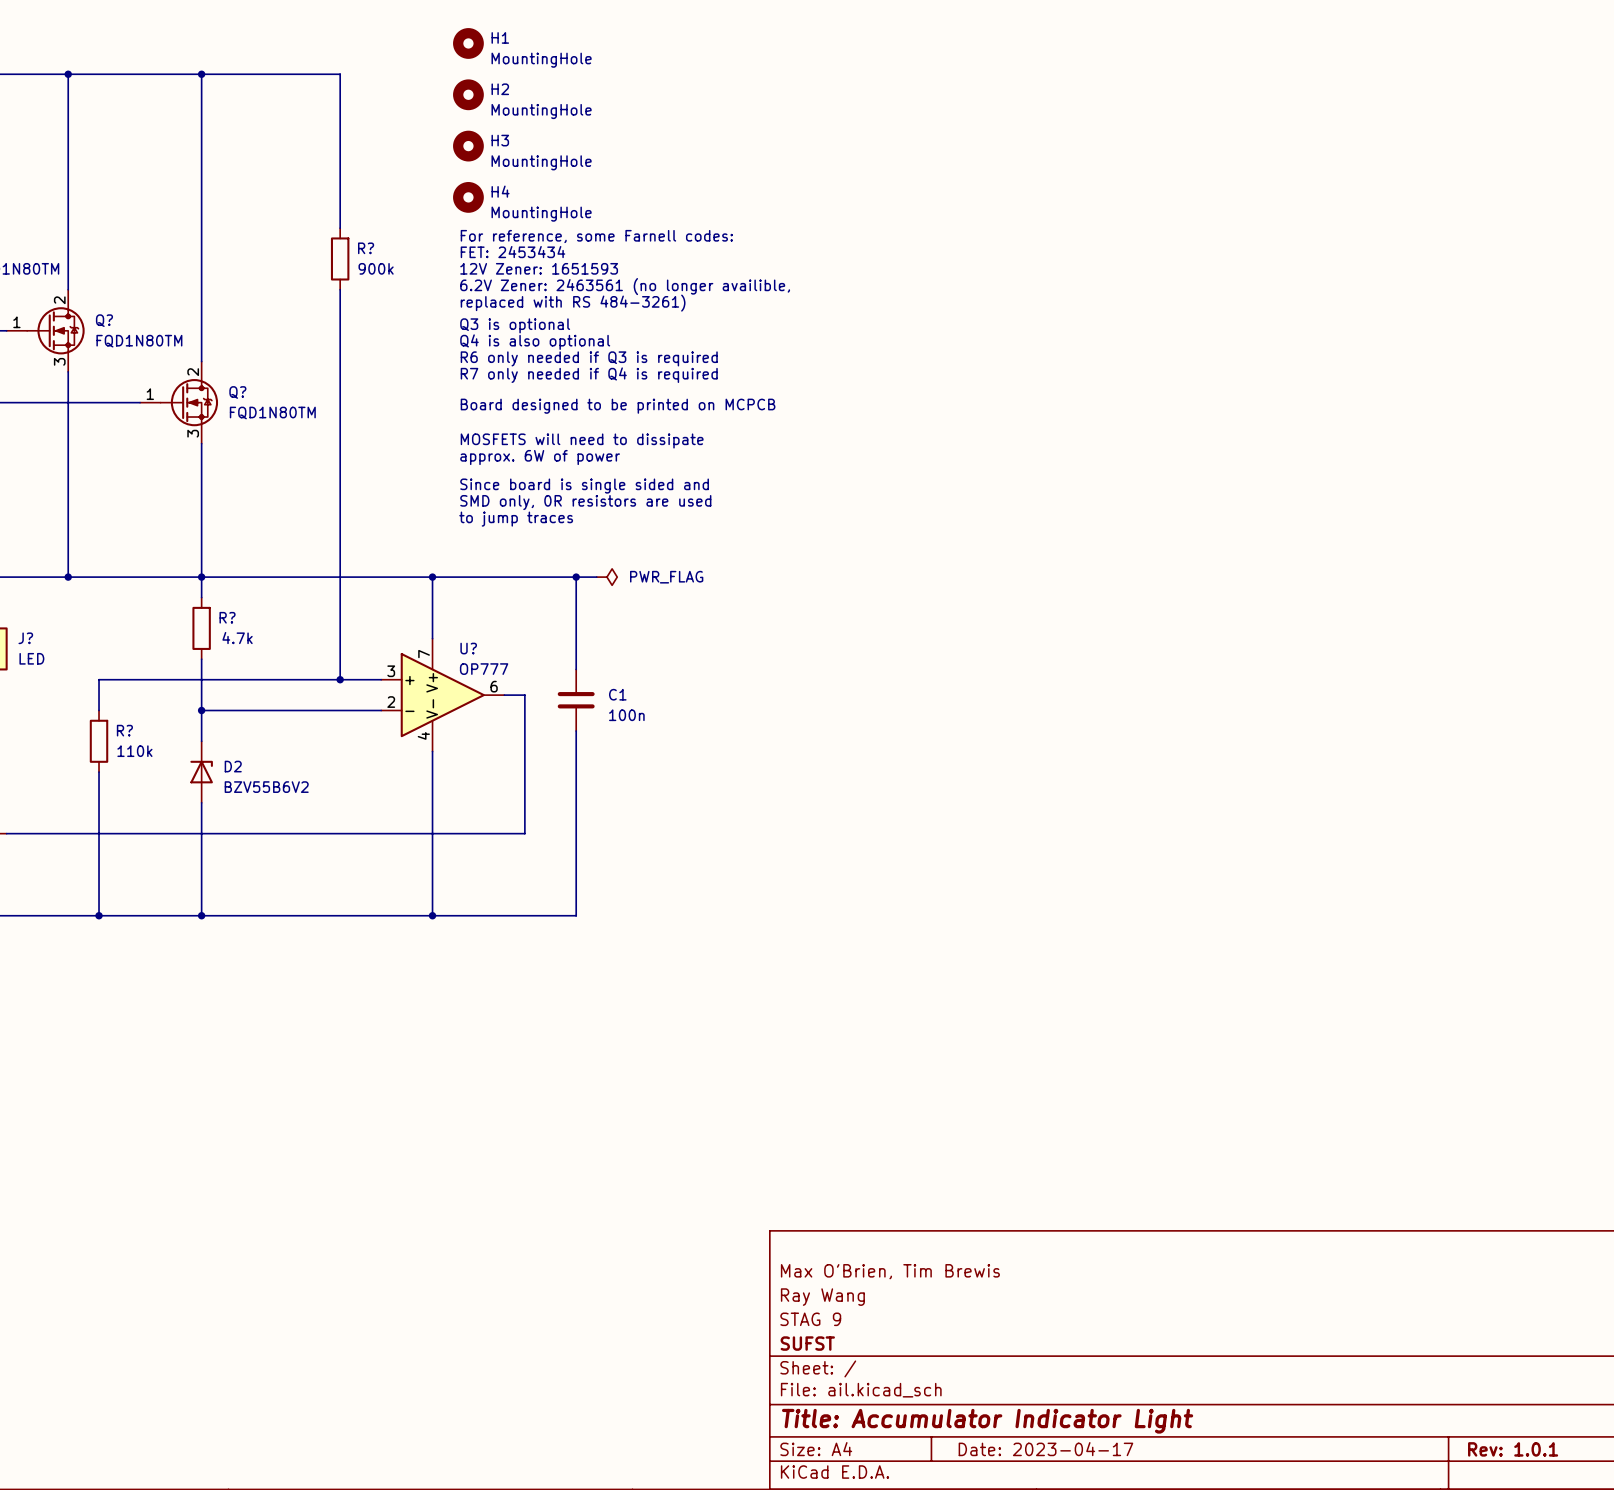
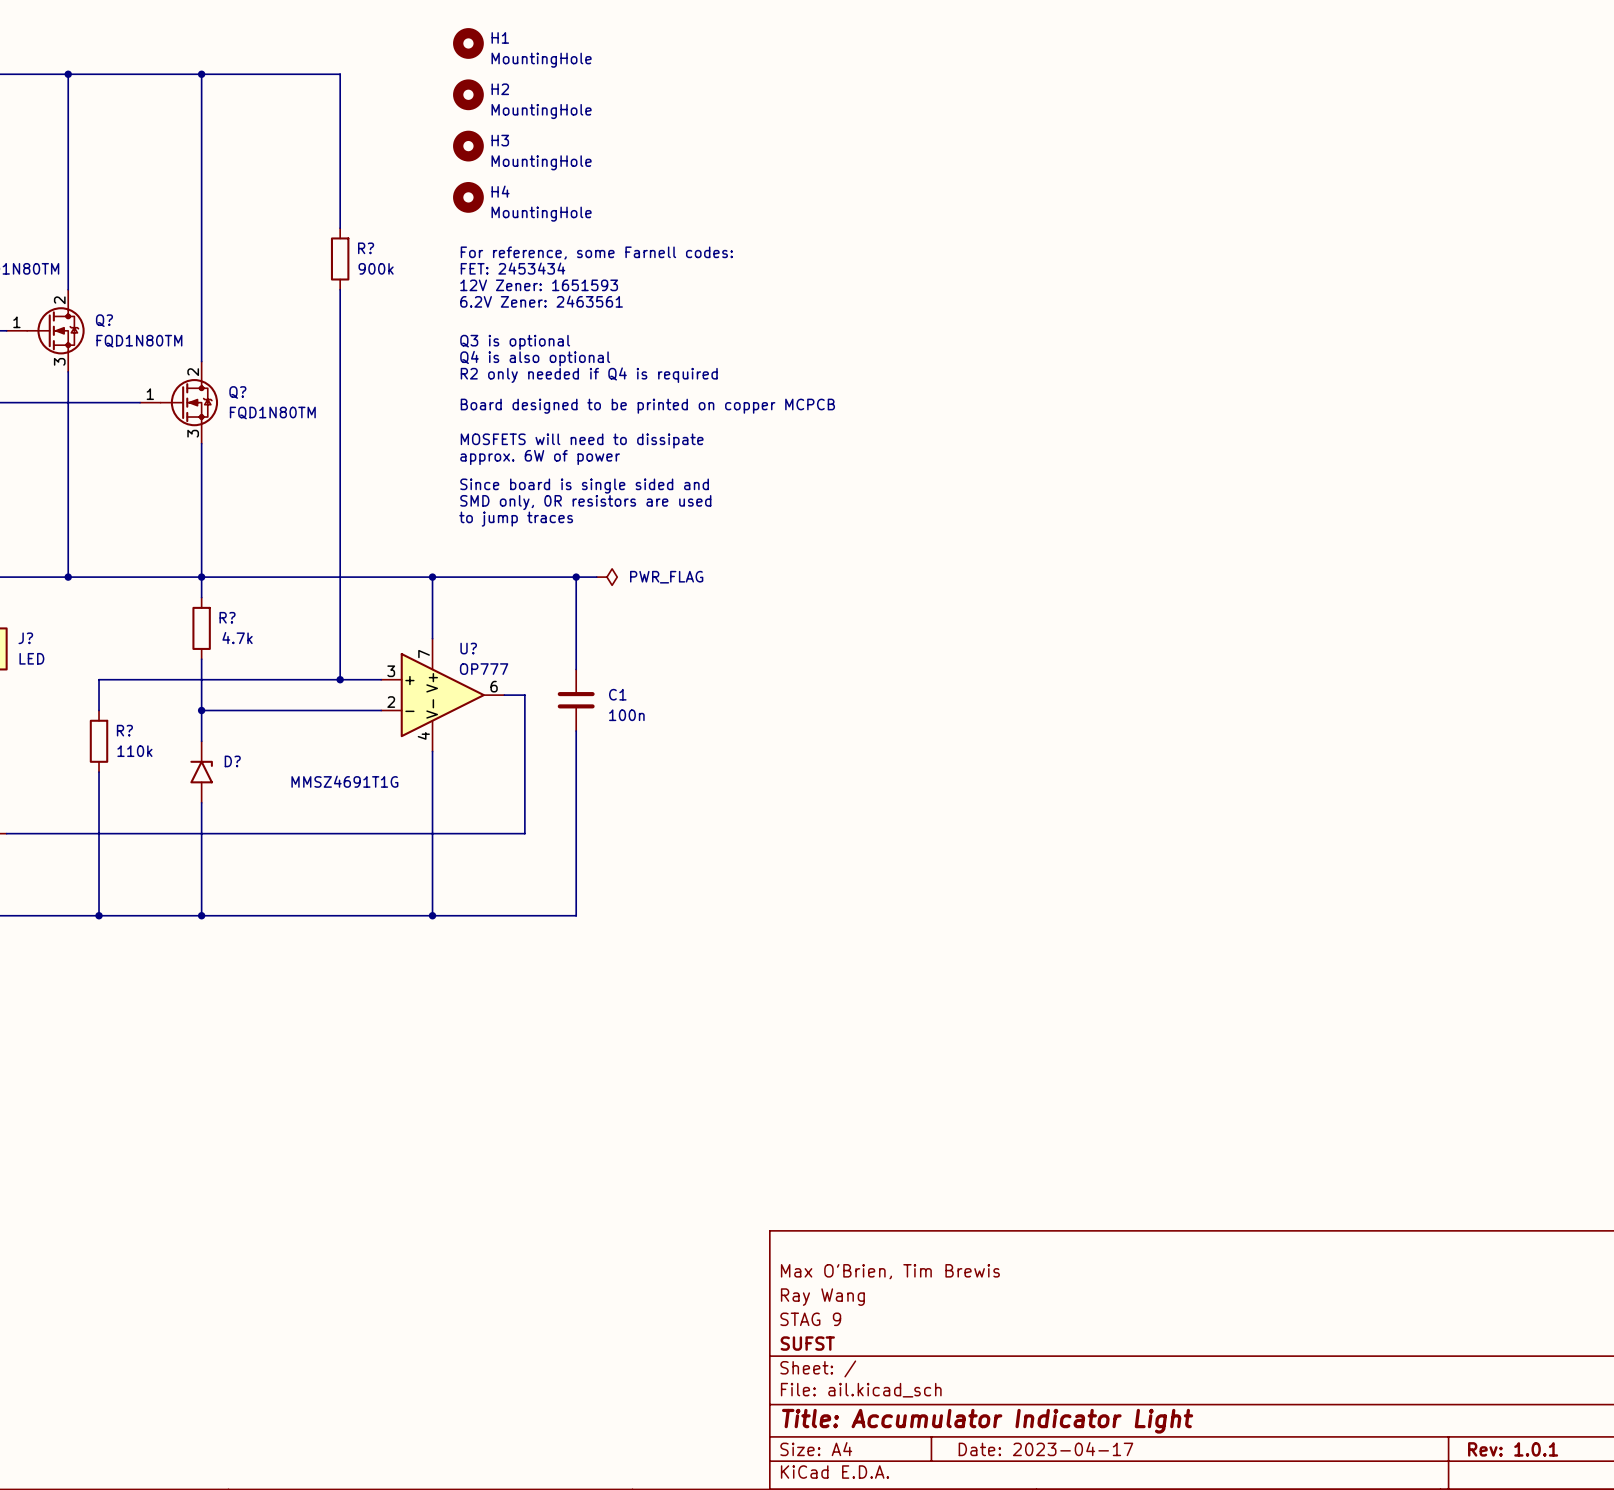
text: For reference, some Farnell codes: (596, 236) -> none
text: FET: 2453434 (512, 252) -> For reference, some Farnell codes: (596, 253)
text: 12V Zener: 1651593 (539, 268) -> FET: 2453434 (512, 268)
text: 6.2V Zener: 2463561 (no longer availible, (625, 286) -> 12V Zener: 1651593 (539, 285)
text: replaced with RS 484-3261) (573, 303) -> 6.2V Zener: 2463561 (541, 301)
text: Q3 is optional (515, 325) -> none
text: Q4 is also optional (535, 342) -> Q3 is optional (515, 342)
text: R6 only needed if Q3 is required (589, 358) -> Q4 is also optional (535, 358)
text: R7 only needed if Q4 is required (589, 375) -> R2 only needed if Q4 is required (589, 375)
text: Board designed to be printed on MCPCB (618, 406) -> Board designed to be printed on copper MCPCB (647, 406)
D2: BZV55B6V2 (201, 772) -> none
D?: none -> MMSZ4691T1G (201, 772)

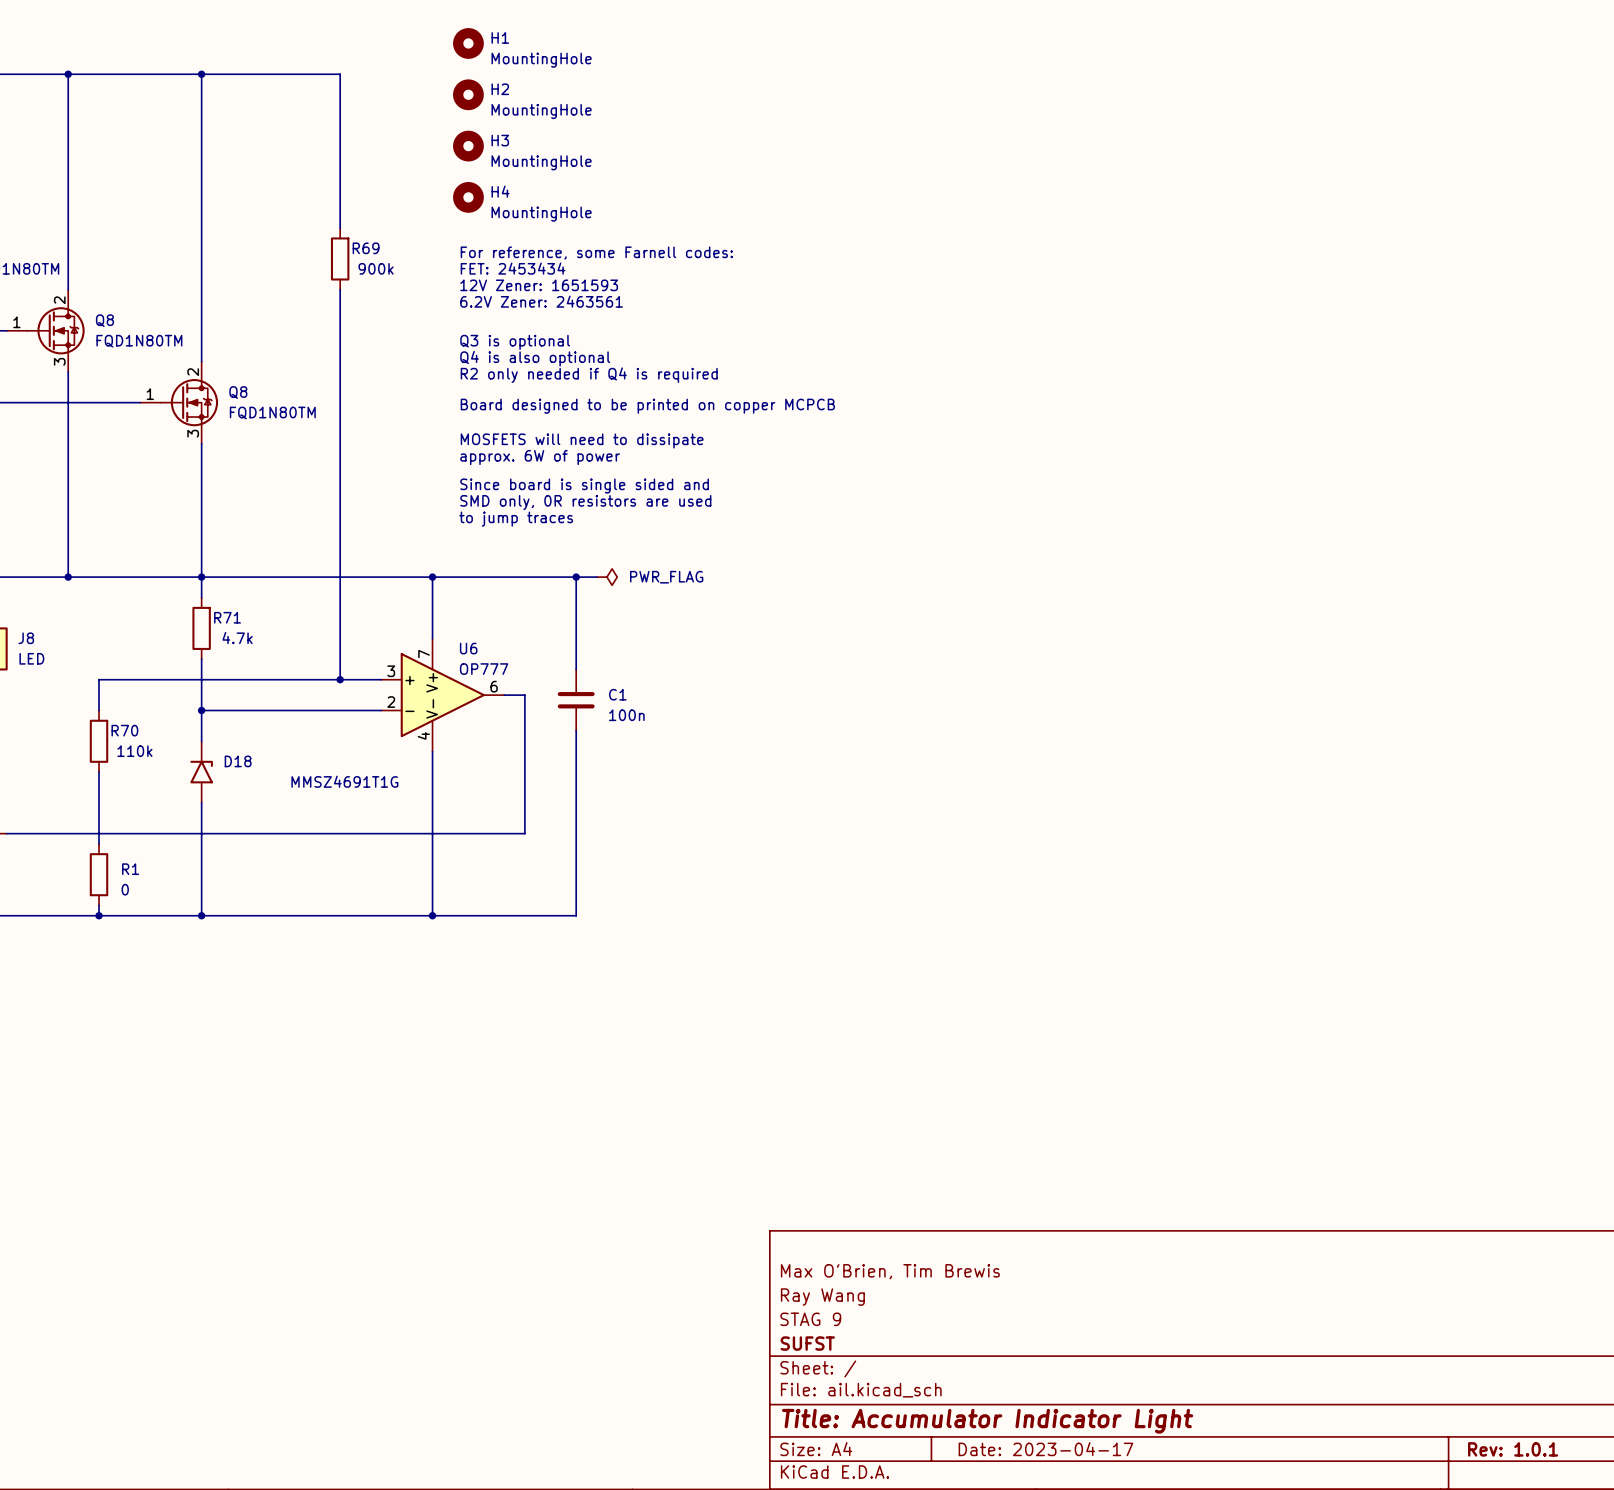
R? name: R? (366, 248) -> R69 (366, 248)
Q? name: Q? (104, 320) -> Q8 (104, 320)
Q? name: Q? (237, 392) -> Q8 (238, 392)
R? name: R? (227, 617) -> R71 (227, 617)
J? name: J? (25, 638) -> J8 (26, 638)
U? name: U? (468, 648) -> U6 (468, 648)
R? name: R? (124, 730) -> R70 (124, 730)
D? name: D? (232, 761) -> D18 (238, 761)
wire: (99, 843) (99, 905) -> none
R1: none -> 0 (99, 874)

